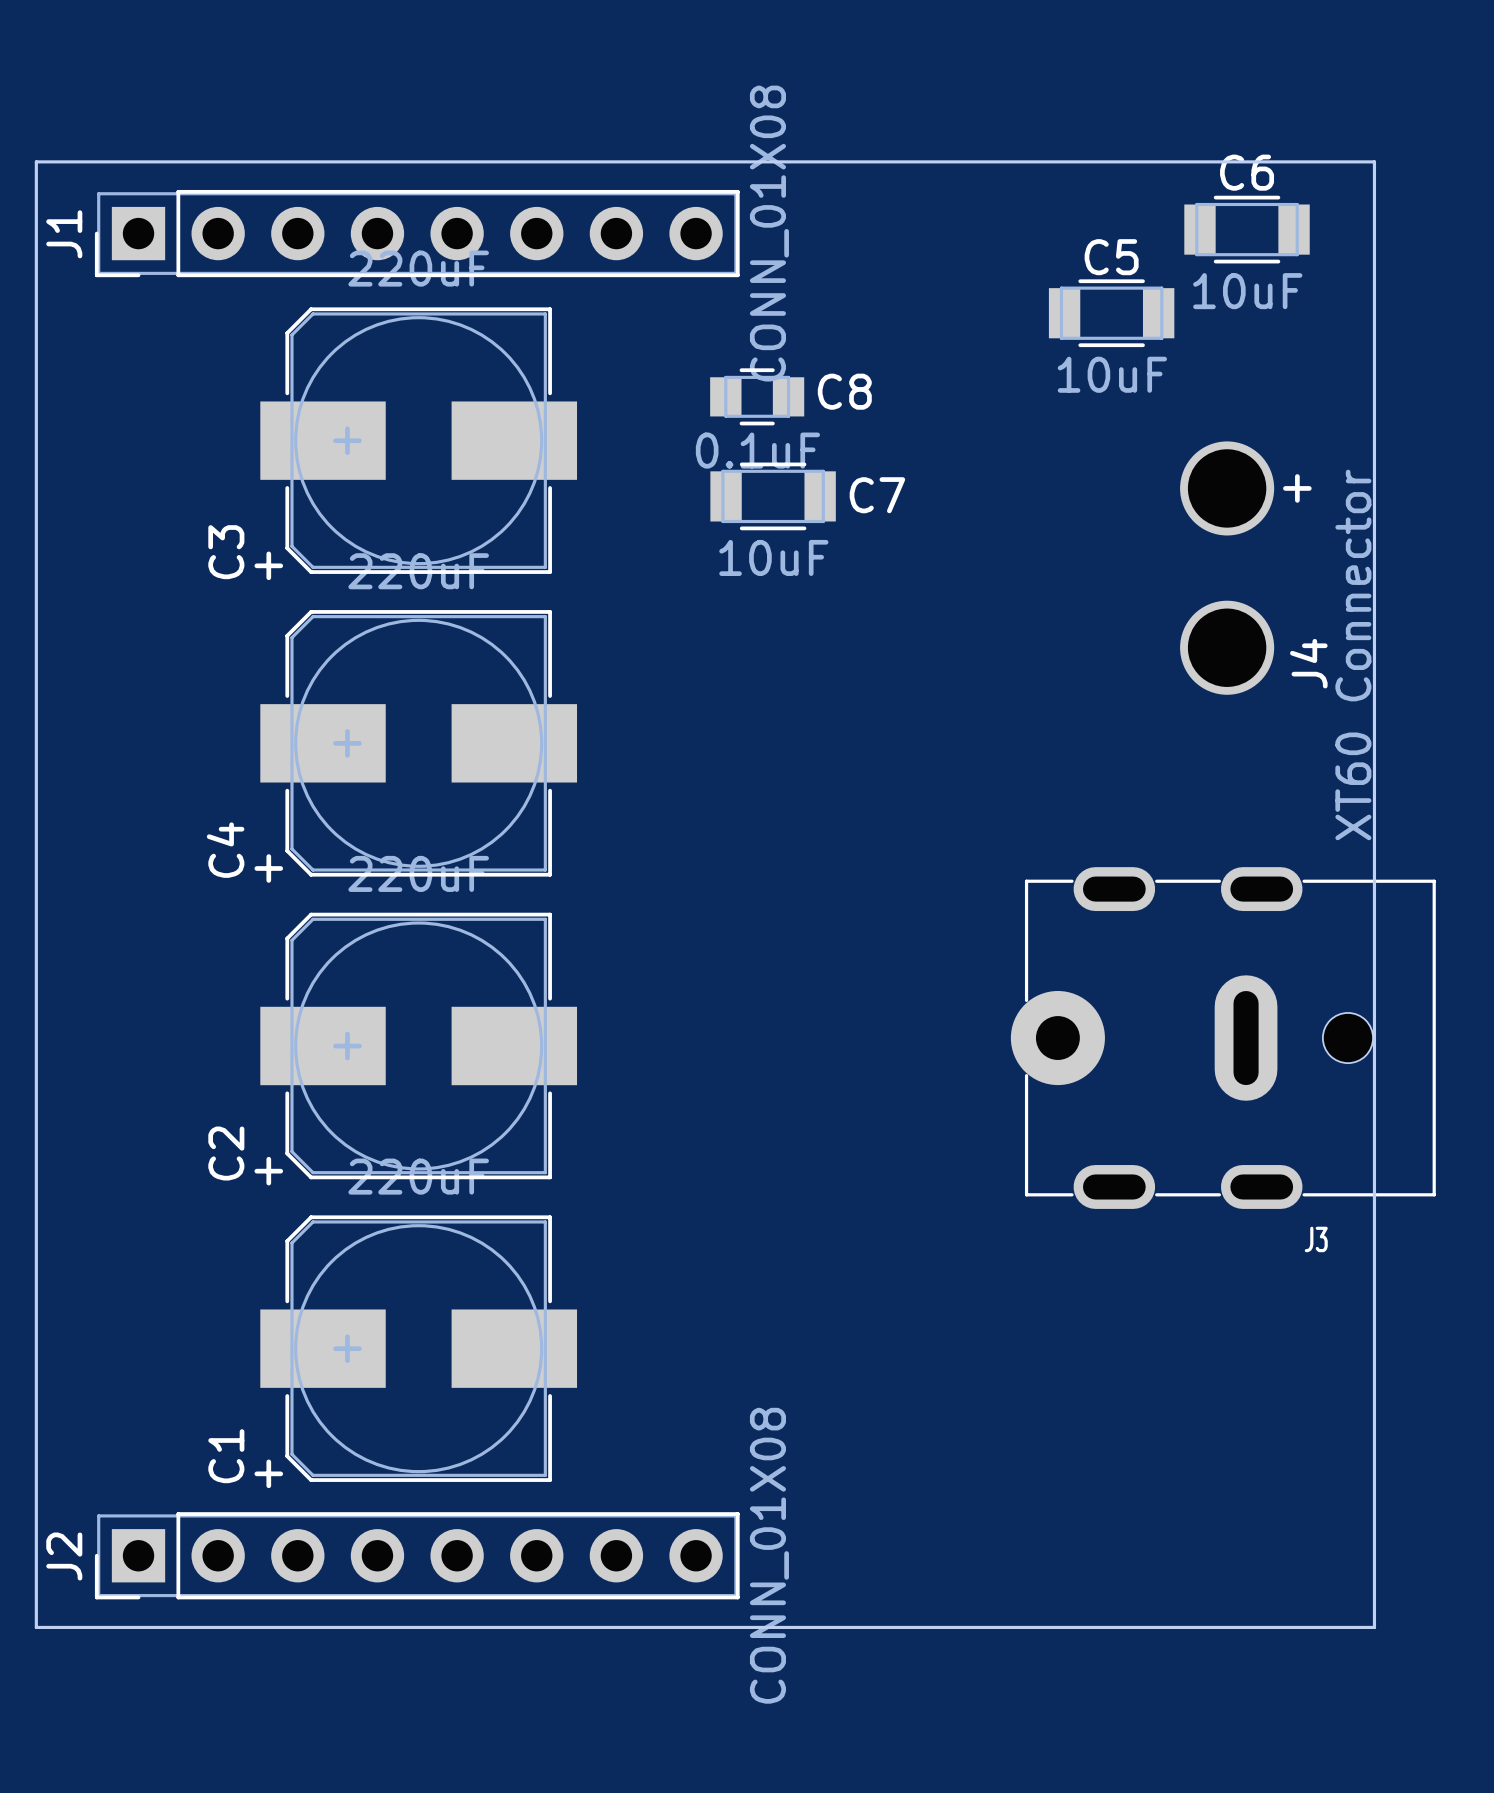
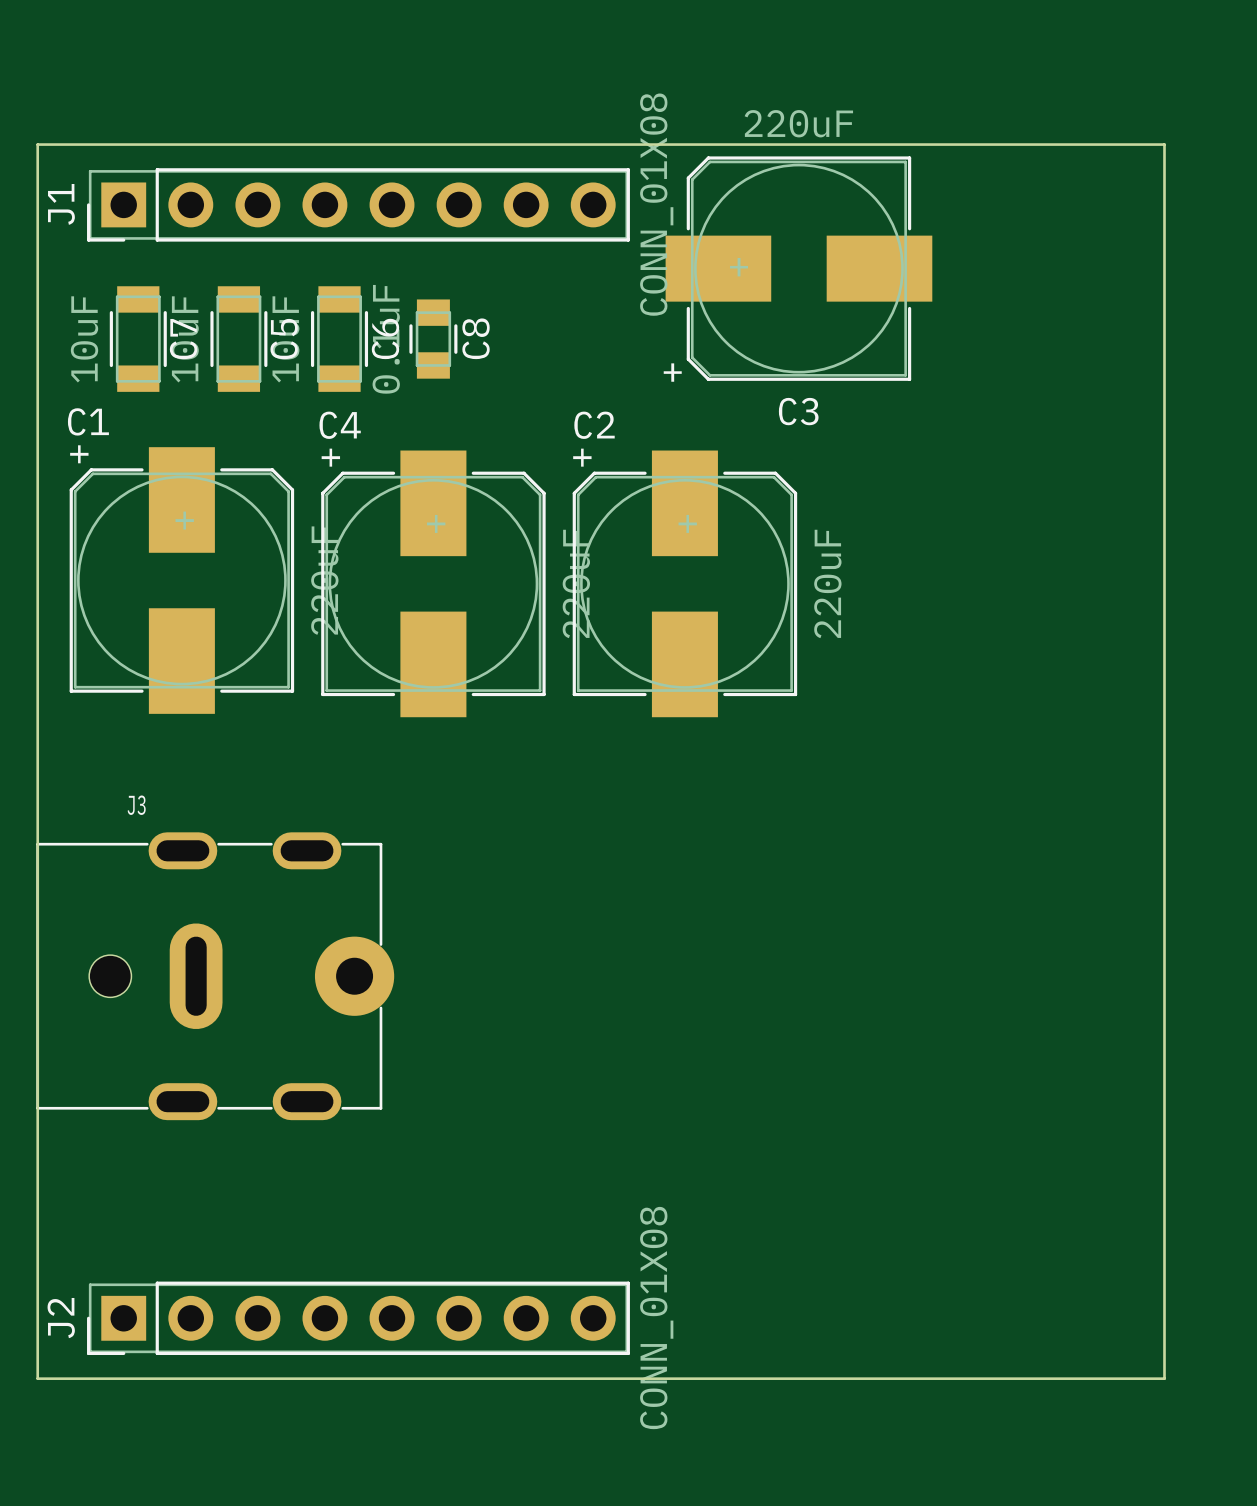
C6 rotation: 0° (1247, 229) -> 90° clockwise (339, 339)
C6 position: (1247, 229) -> (339, 339)
C5 rotation: 0° (1111, 313) -> 90° clockwise (238, 339)
C5 position: (1111, 313) -> (238, 339)
C8 rotation: 0° (757, 396) -> 90° clockwise (433, 339)
C8 position: (757, 396) -> (433, 339)
C3 position: (418, 440) -> (798, 268)
C7 rotation: 0° (773, 496) -> 90° clockwise (138, 339)
C7 position: (773, 496) -> (138, 339)
C3 name rotation: 0° (226, 552) -> 90° clockwise (798, 411)
C3 name position: C3 (226, 552) -> C3 (798, 411)
J4: XT60 Connector (1227, 568) -> none
C4 rotation: 0° (418, 743) -> 90° clockwise (433, 583)
J3 rotation: 0° (1223, 1038) -> 180° (215, 976)
J3 position: (1223, 1038) -> (215, 976)
C2 rotation: 0° (418, 1045) -> 90° clockwise (684, 583)
C2 position: (418, 1045) -> (684, 583)
C1 rotation: 0° (418, 1348) -> 90° clockwise (181, 580)
C1 position: (418, 1348) -> (181, 580)

